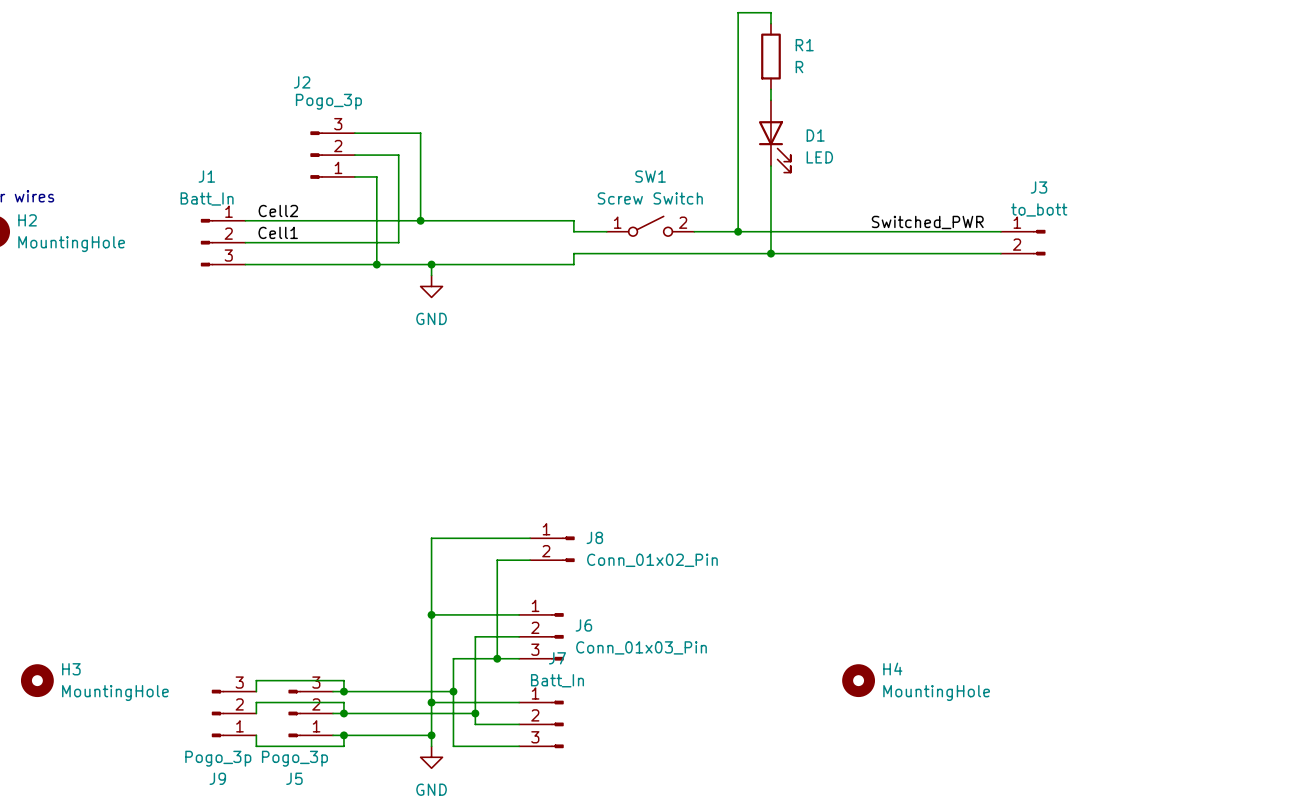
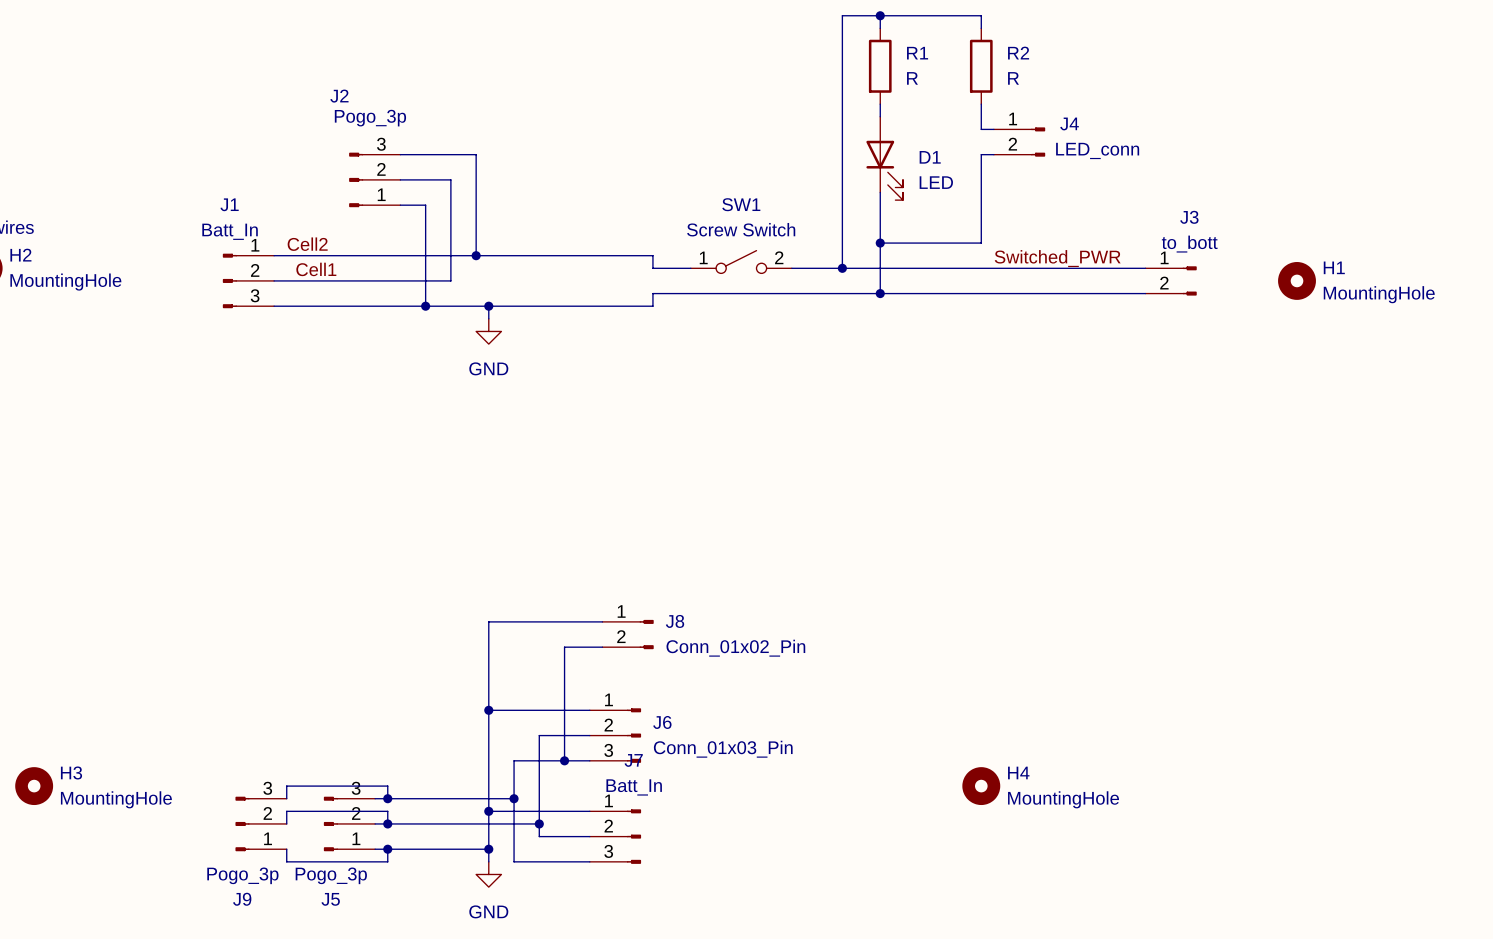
wire: none -> (880, 15) (981, 15) (981, 28)
junction: none -> (880, 15)
R2: none -> R (981, 66)
wire: none -> (981, 104) (981, 129) (993, 129)
J4: none -> LED_conn (1019, 142)
wire: none -> (993, 154) (981, 154) (981, 243) (880, 243)
junction: none -> (880, 243)
H1: none -> MountingHole (1297, 280)

